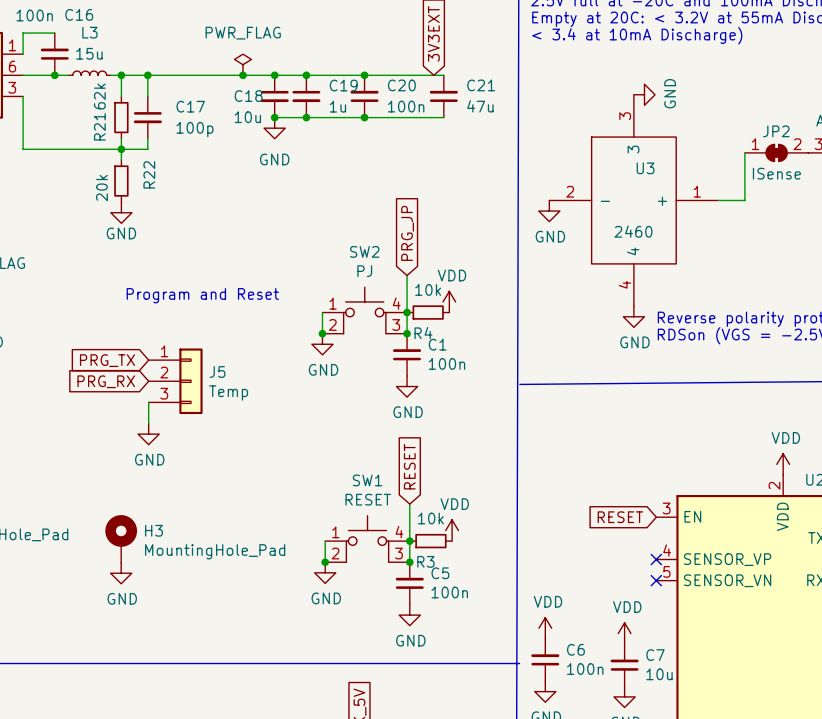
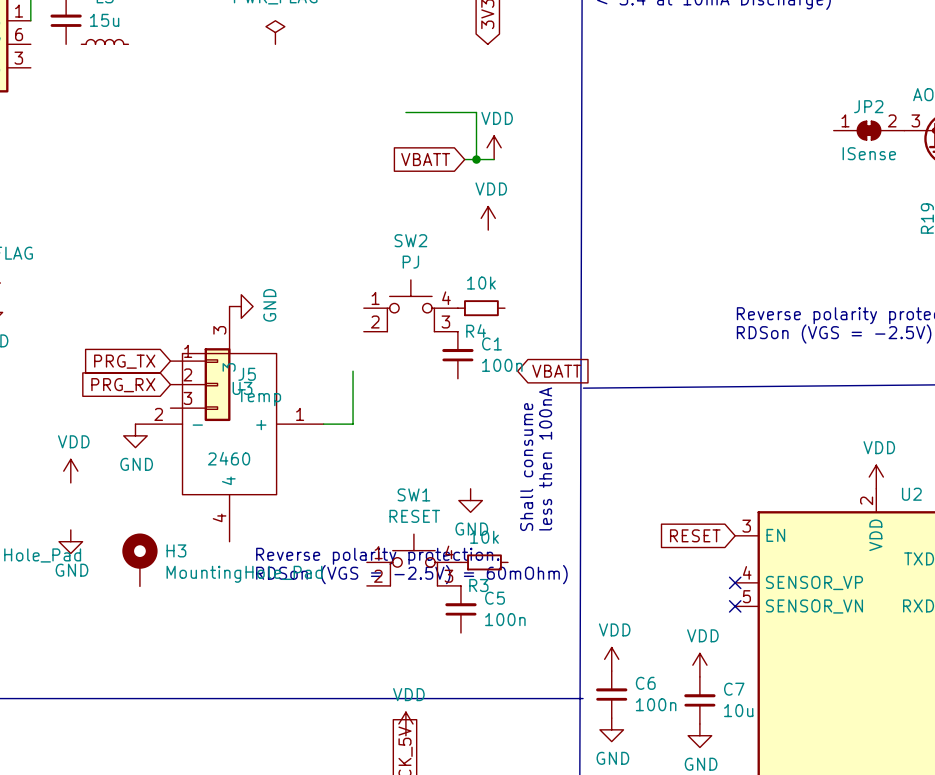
wire: (23, 75) (68, 75) -> none
junction: (54, 75) -> none
wire: (110, 75) (443, 75) -> none
wire: (121, 75) (121, 96) -> none
junction: (121, 75) -> none
wire: (147, 75) (147, 96) -> none
junction: (147, 75) -> none
junction: (242, 75) -> none
junction: (274, 75) -> none
junction: (306, 75) -> none
junction: (364, 75) -> none
power symbol: GND (644, 94) -> none
wire: (23, 96) (23, 149) (147, 149) (147, 138) -> none
C18: 10u (274, 96) -> none
C19: 1u (306, 96) -> none
C20: 100n (364, 96) -> none
C21: 47u (443, 96) -> none
R21: 62k (121, 117) -> none
C17: 100p (147, 117) -> none
wire: (274, 117) (443, 117) -> none
junction: (274, 117) -> none
junction: (306, 117) -> none
junction: (364, 117) -> none
power symbol: GND (274, 128) -> none
wire: none -> (405, 112) (476, 112) (476, 159)
wire: (121, 138) (121, 159) -> none
junction: (121, 149) -> none
wire: (744, 152) (744, 200) (718, 200) -> none
power symbol: none -> VDD (494, 147)
global label: none -> VBATT (425, 159)
wire: none -> (464, 159) (494, 159)
junction: none -> (476, 159)
R22: 20k (121, 181) -> none
U3 position: (633, 200) -> (229, 424)
power symbol: GND (549, 211) -> none
power symbol: GND (121, 212) -> none
power symbol: none -> VDD (488, 218)
global label: PRG_JP (407, 233) -> none
wire: (407, 275) (407, 333) -> none
text: Program and Reset (202, 295) -> none
power symbol: VDD (449, 301) -> none
power symbol: none -> GND (241, 306)
wire: (322, 312) (322, 333) -> none
junction: (407, 312) -> none
power symbol: GND (633, 316) -> none
junction: (322, 333) -> none
junction: (407, 333) -> none
power symbol: GND (322, 344) -> none
wire: none -> (353, 371) (353, 424) (323, 424)
global label: none -> VBATT (556, 371)
power symbol: GND (407, 386) -> none
wire: (148, 402) (148, 423) -> none
power symbol position: GND (148, 434) -> GND (135, 435)
text: none -> less then 100nA (545, 458)
text: none -> Shall consume (526, 467)
power symbol: none -> VDD (70, 471)
global label: RESET (409, 466) -> none
power symbol: none -> GND (470, 500)
wire: (409, 504) (409, 562) -> none
power symbol: none -> GND (70, 541)
power symbol: VDD (452, 530) -> none
text: none -> Reverse polarity protection. (377, 556)
wire: (325, 541) (325, 562) -> none
junction: (409, 541) -> none
text: none -> RDSon (VGS = -2.5V) = 60mOhm) (411, 574)
junction: (325, 562) -> none
junction: (409, 562) -> none
power symbol: GND (325, 572) -> none
power symbol: GND (121, 573) -> none
power symbol: GND (409, 615) -> none
power symbol: none -> VDD (405, 723)

